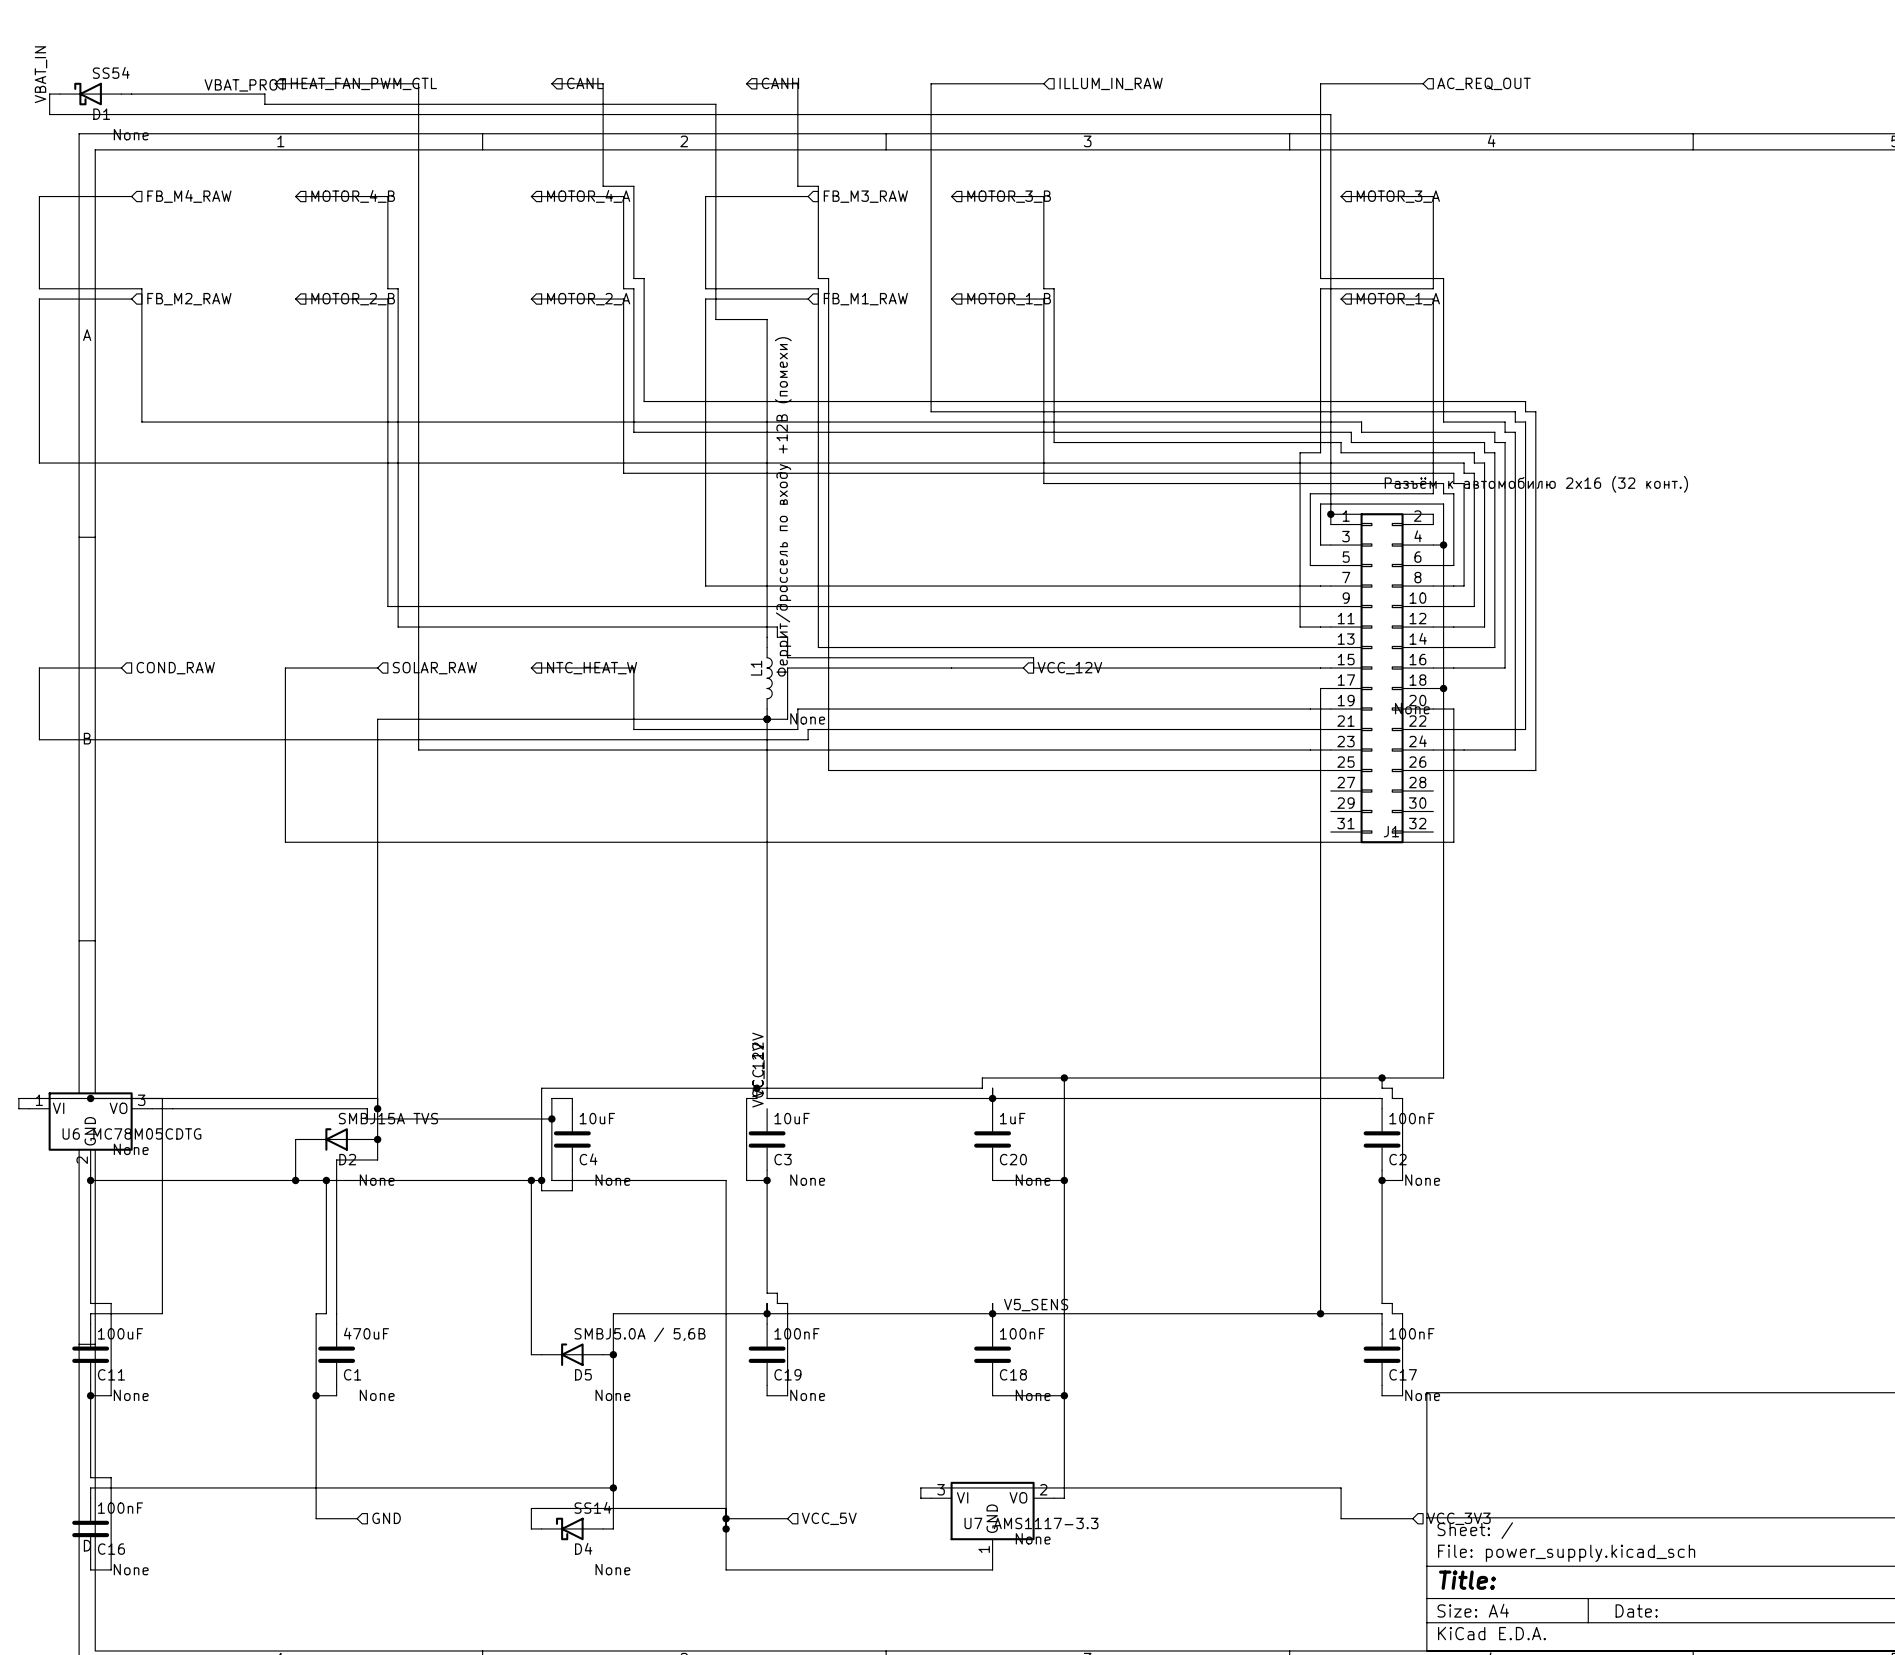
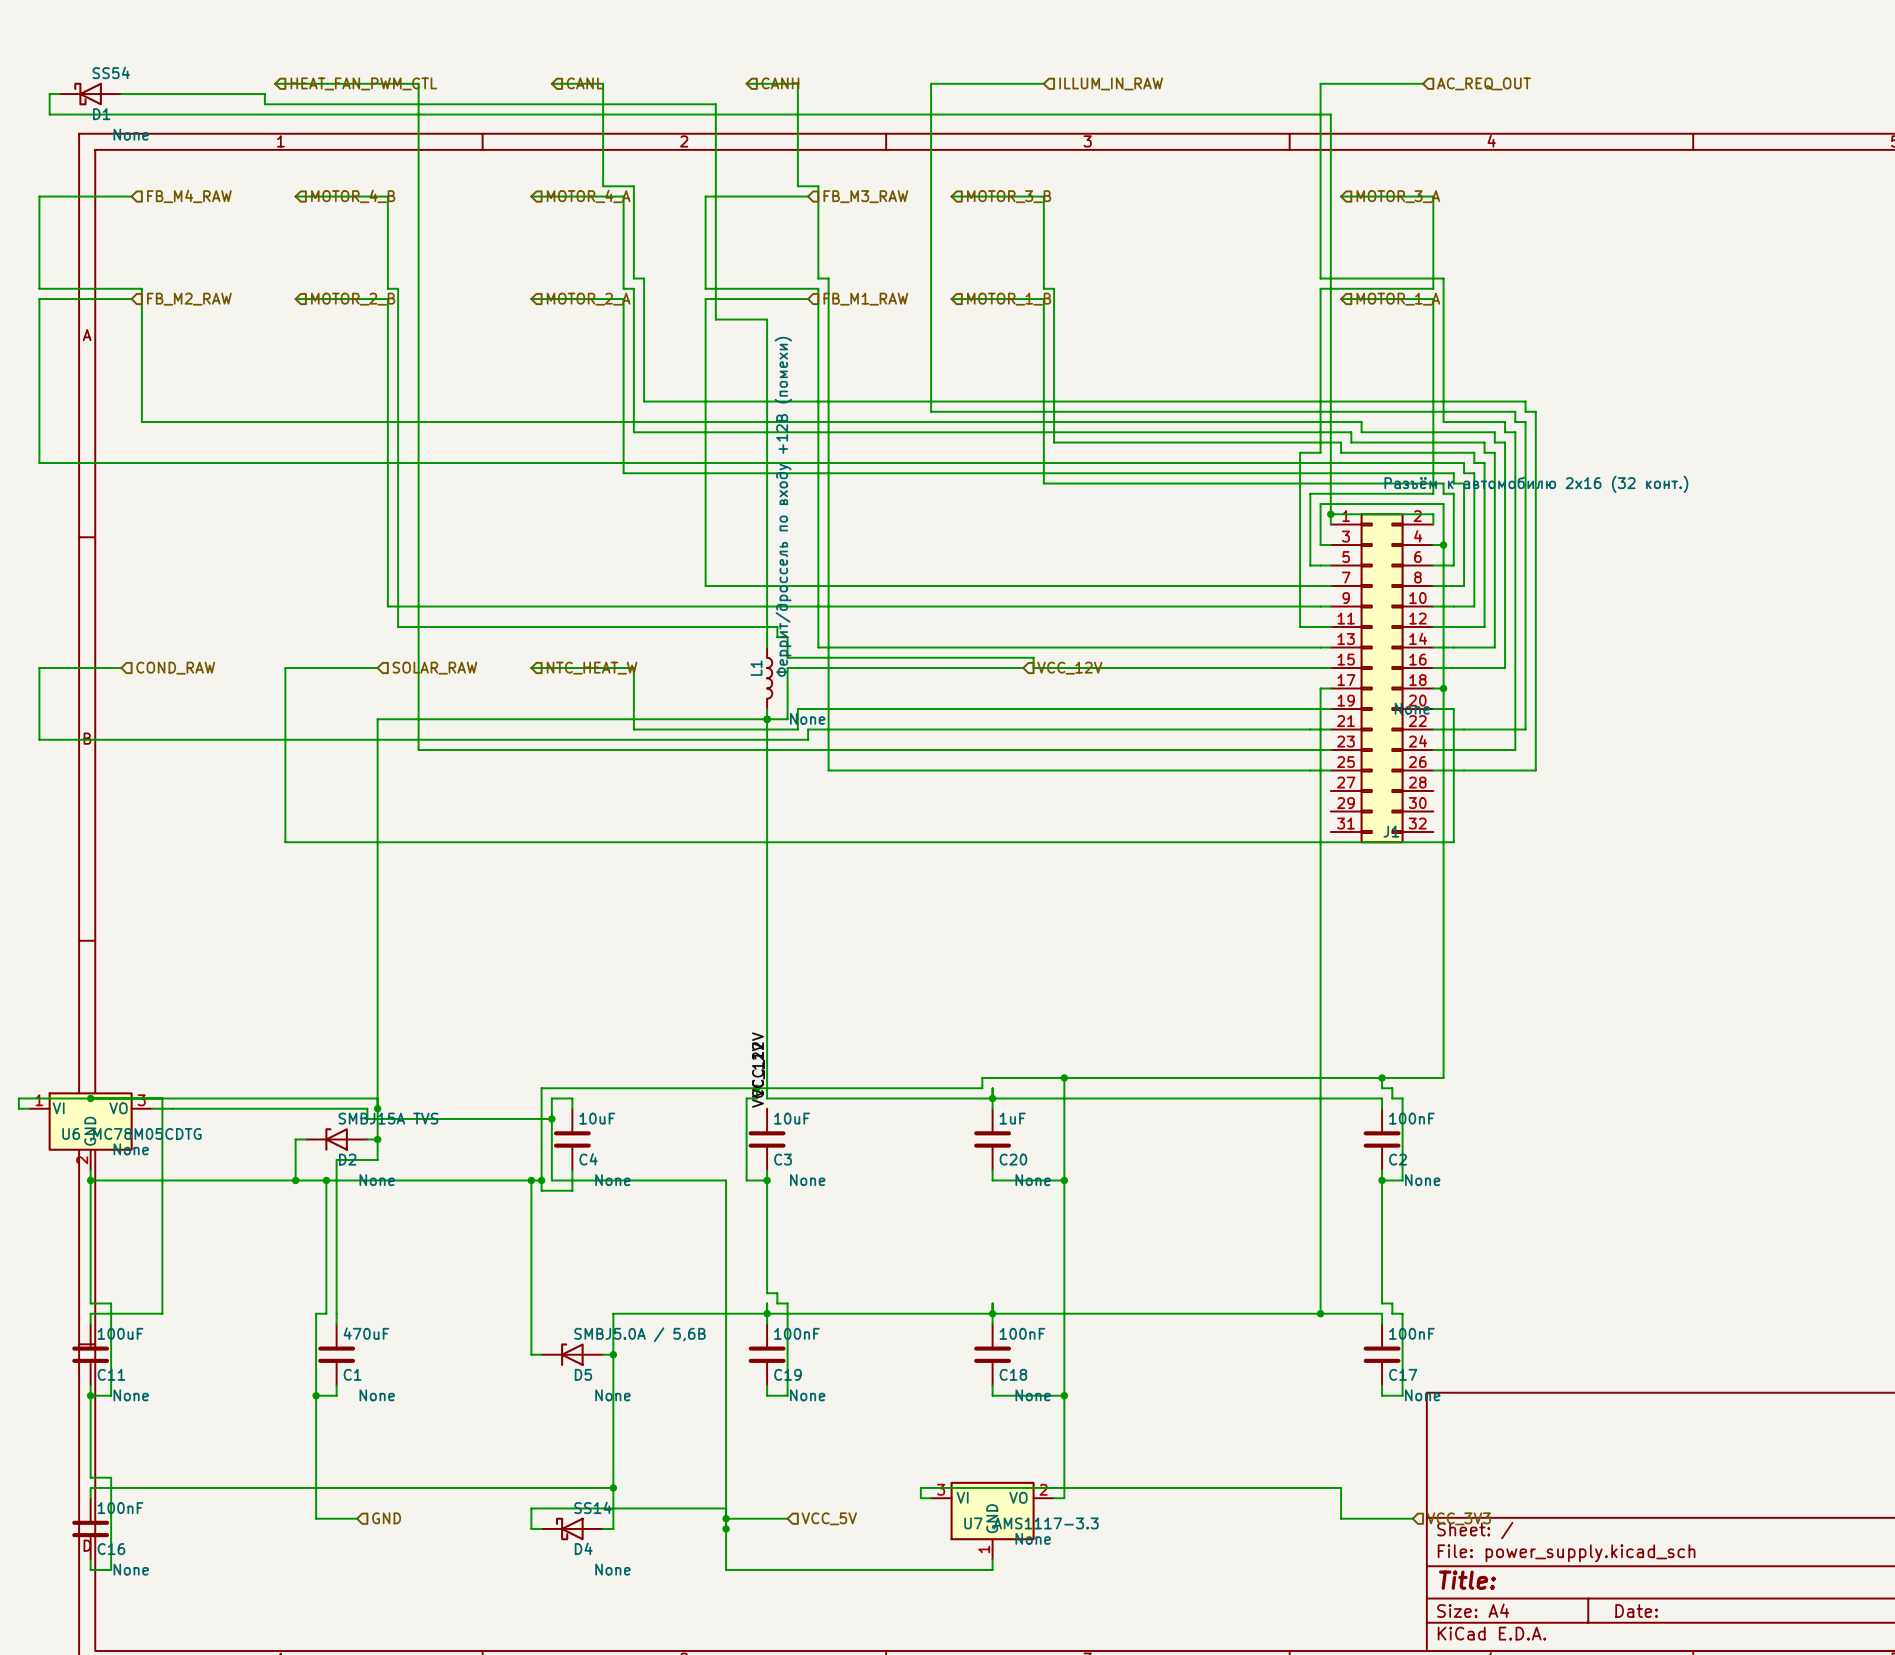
label: VBAT_IN (40, 74) -> none
label: VBAT_PROT (245, 85) -> none
label: V5_SENS (1036, 1305) -> none

